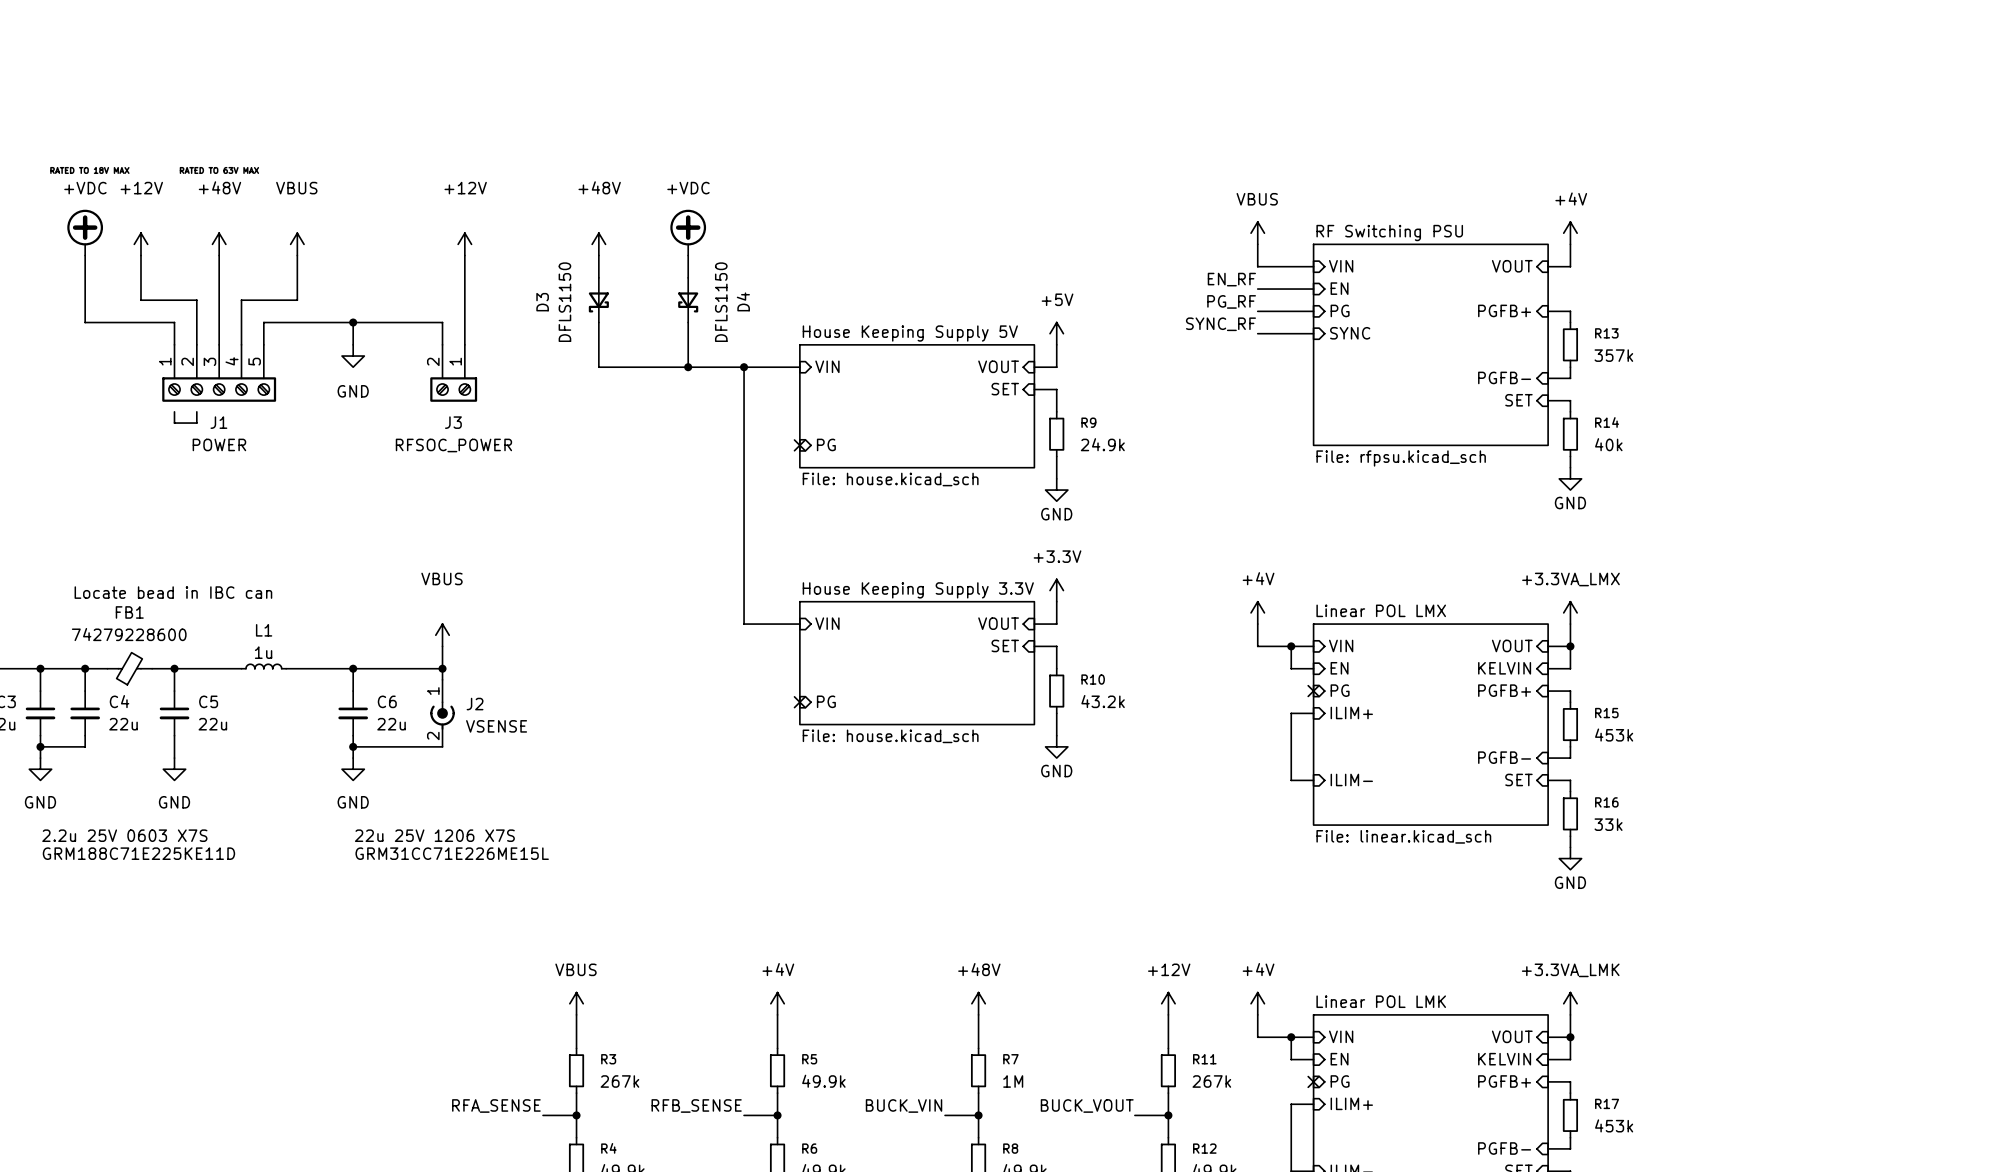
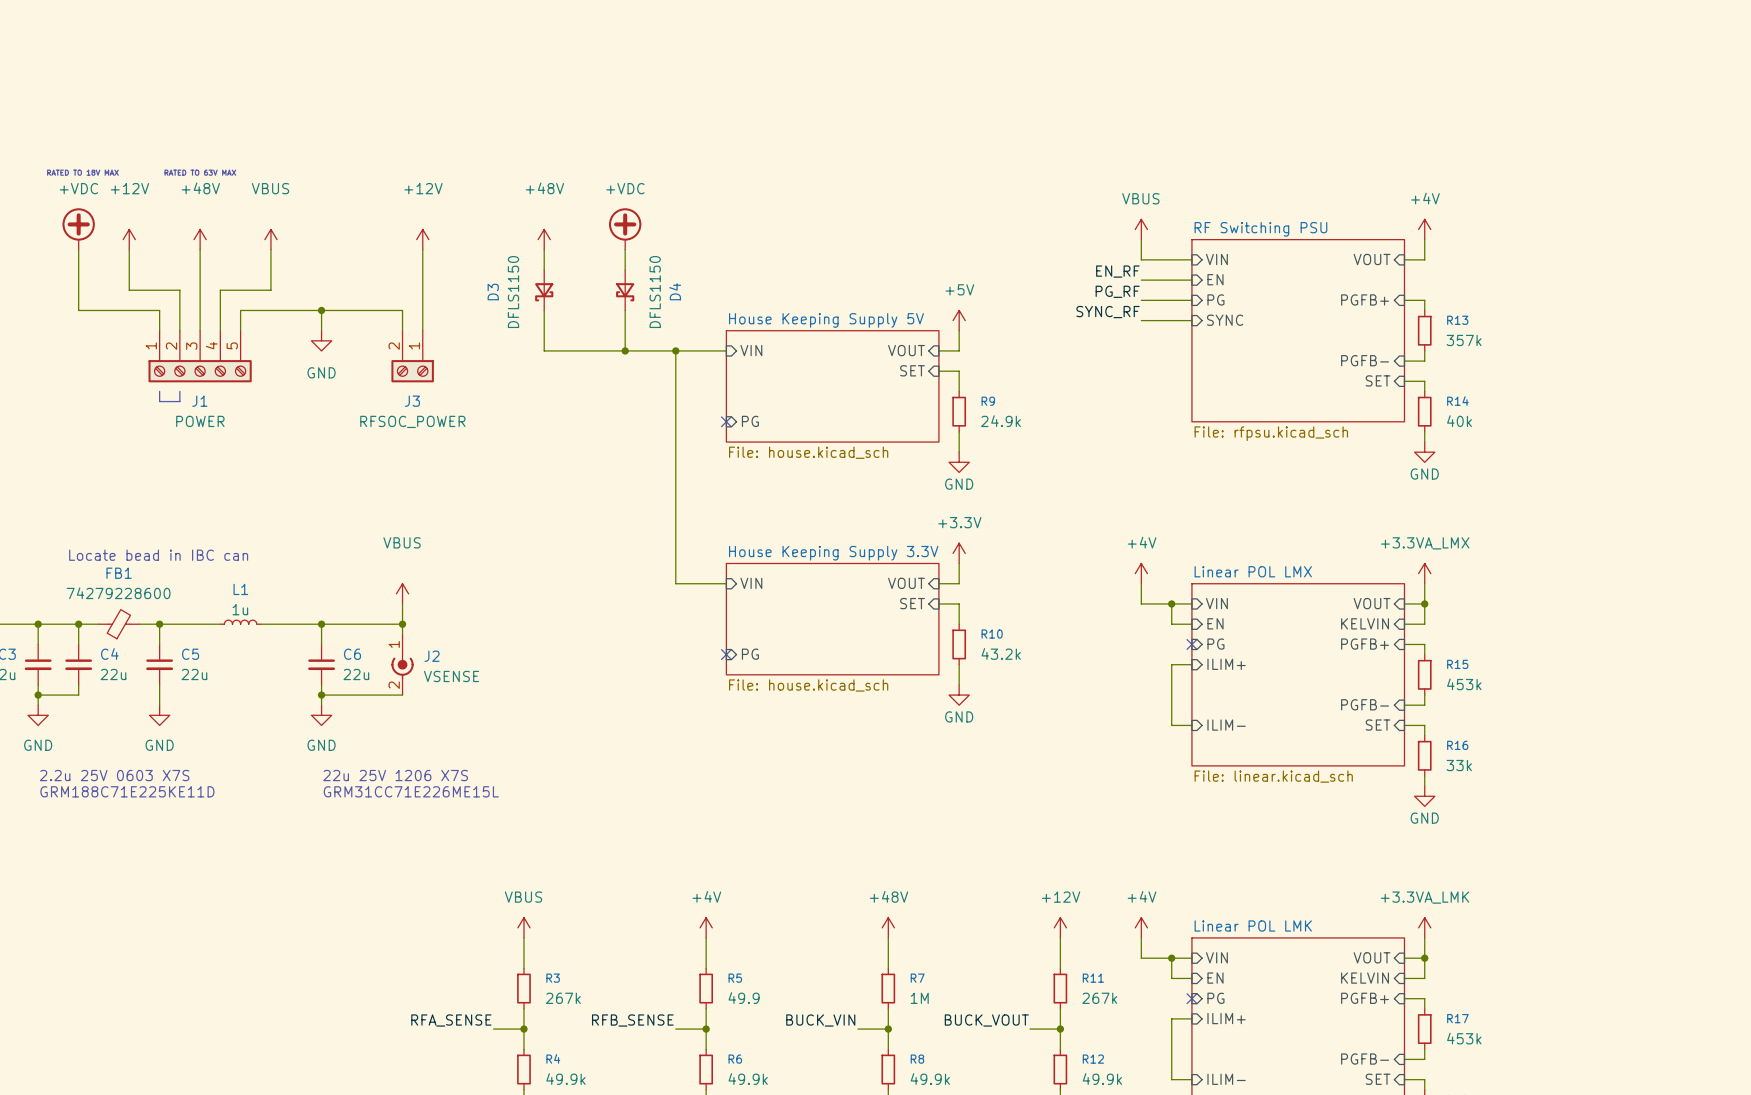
R5 value: 49.9k (823, 1081) -> 49.9 (744, 998)

